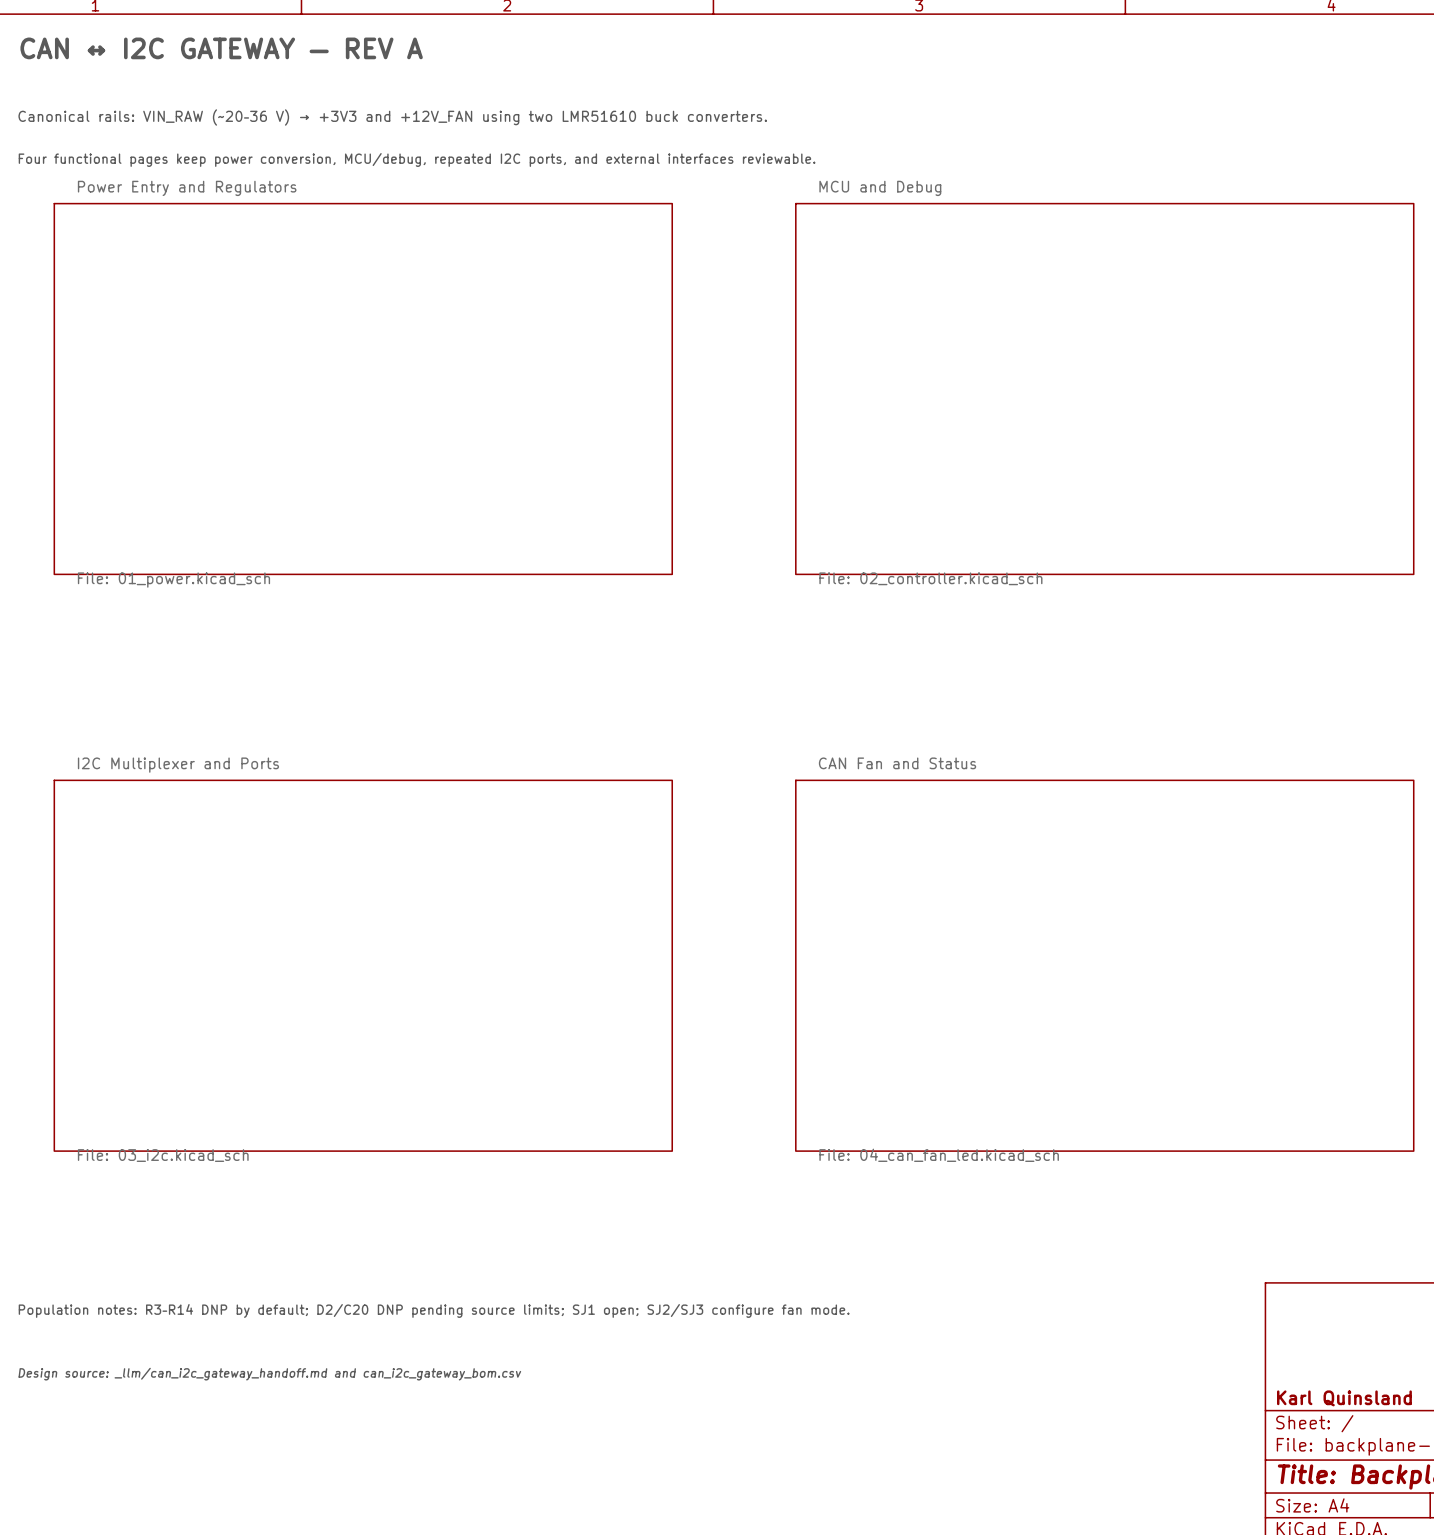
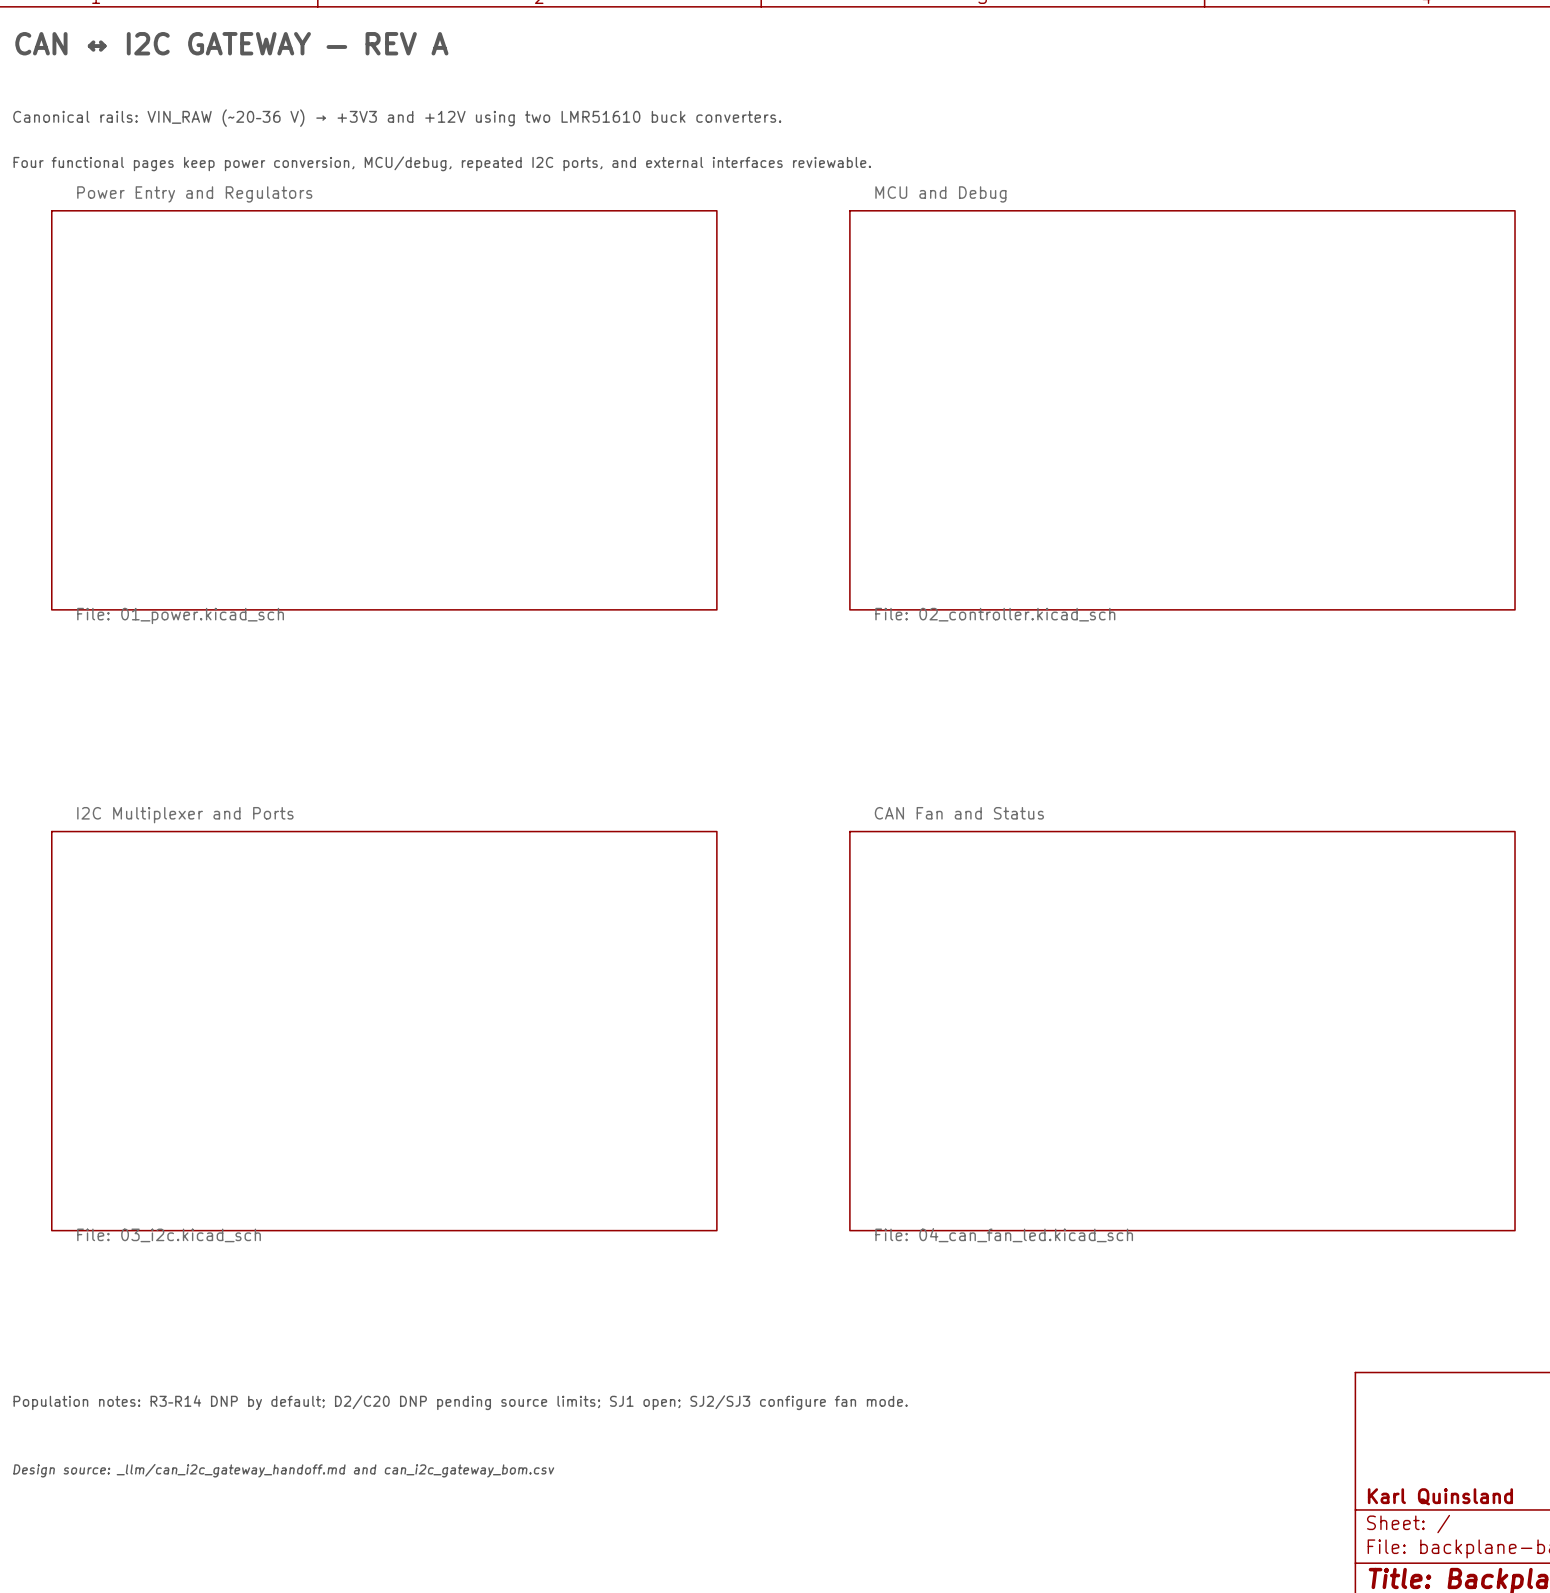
text: Canonical rails: VIN_RAW (~20–36 V) → +3V3 and +12V_FAN using two LMR51610 buck converters. (392, 117) -> Canonical rails: VIN_RAW (~20–36 V) → +3V3 and +12V using two LMR51610 buck converters. (397, 118)

